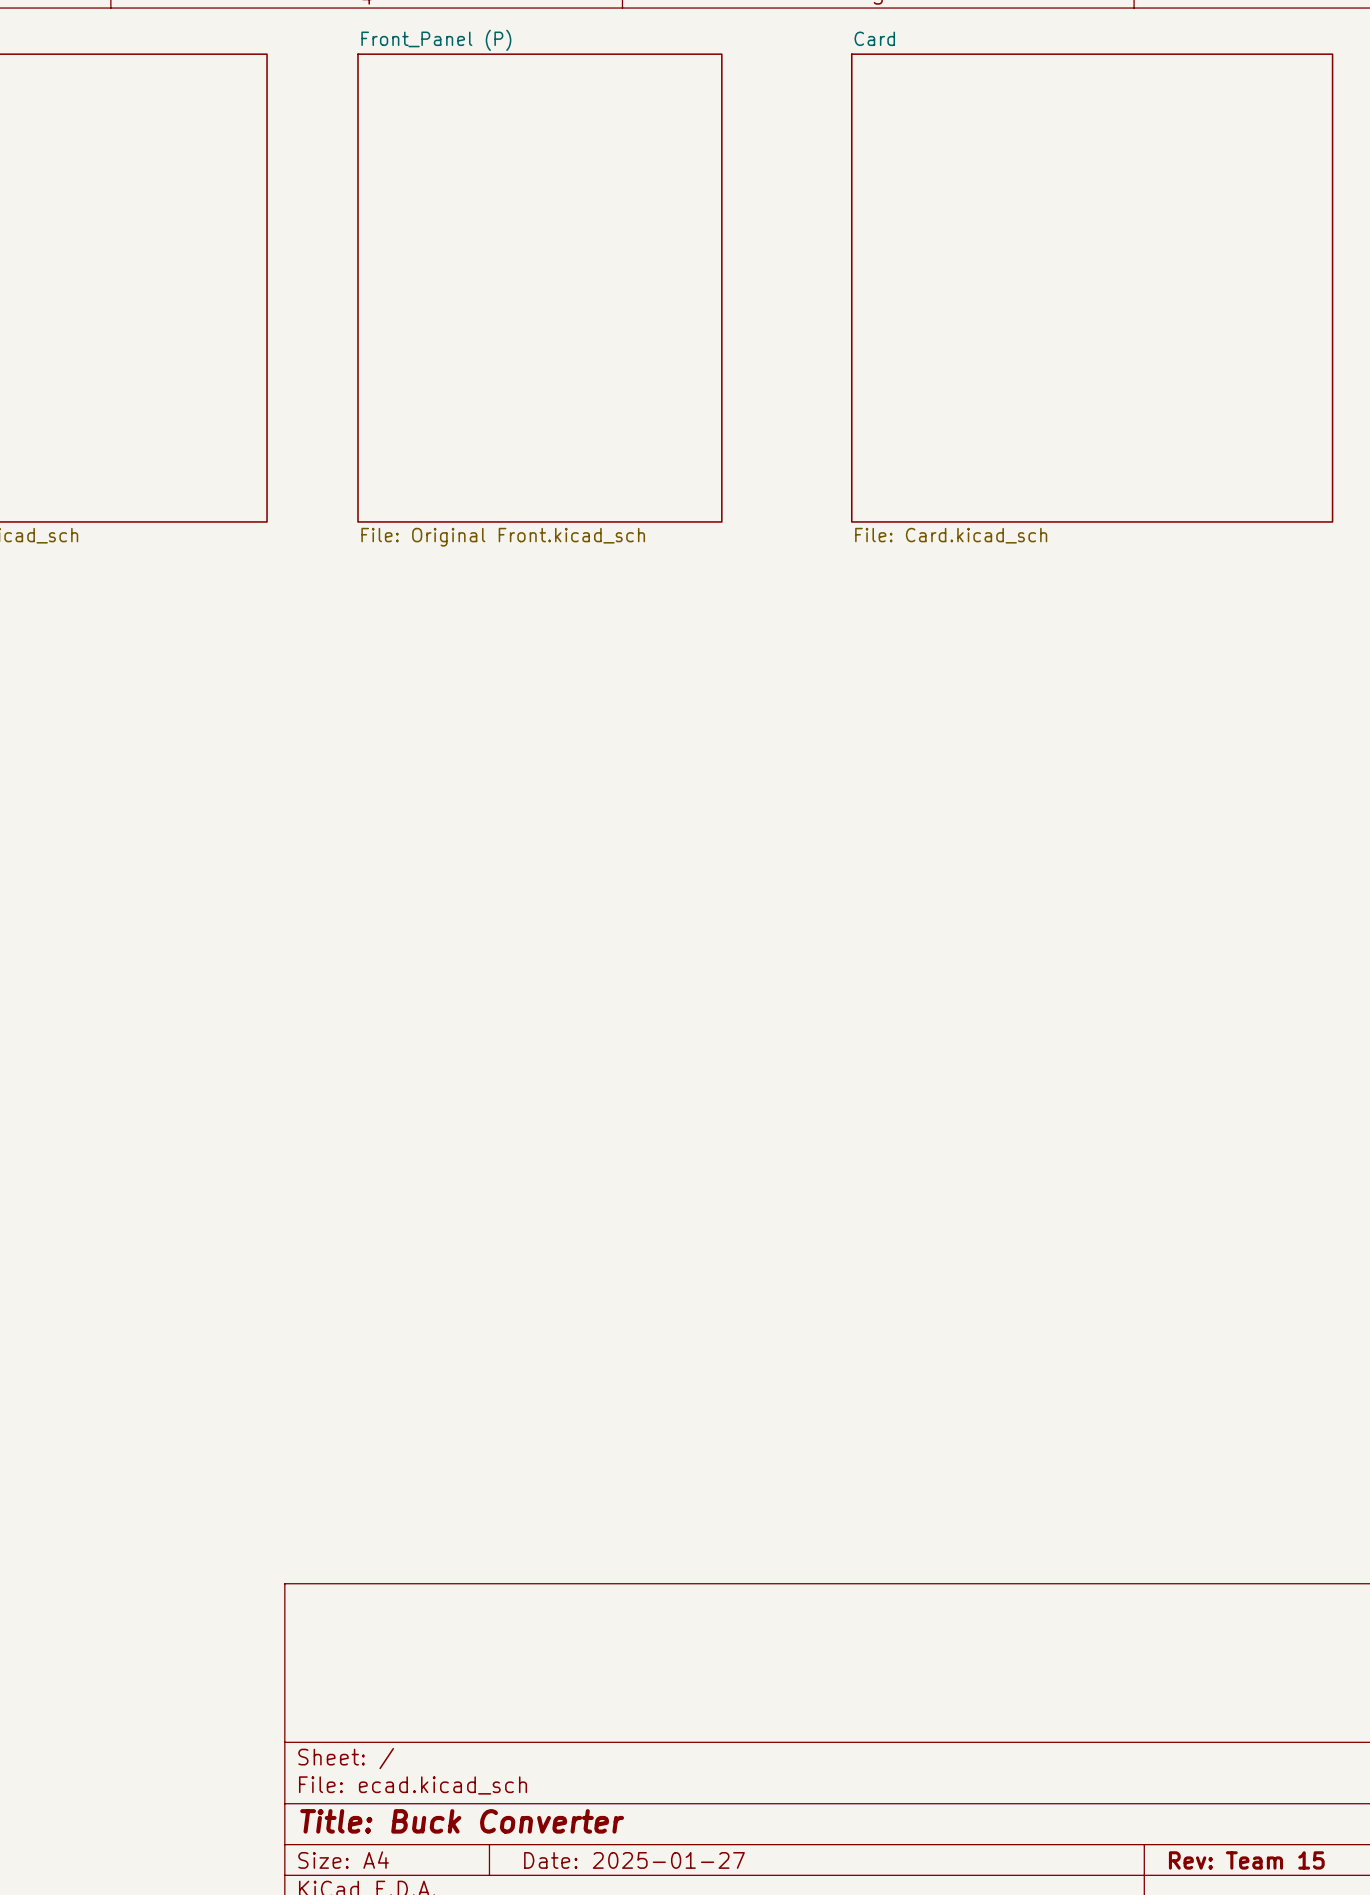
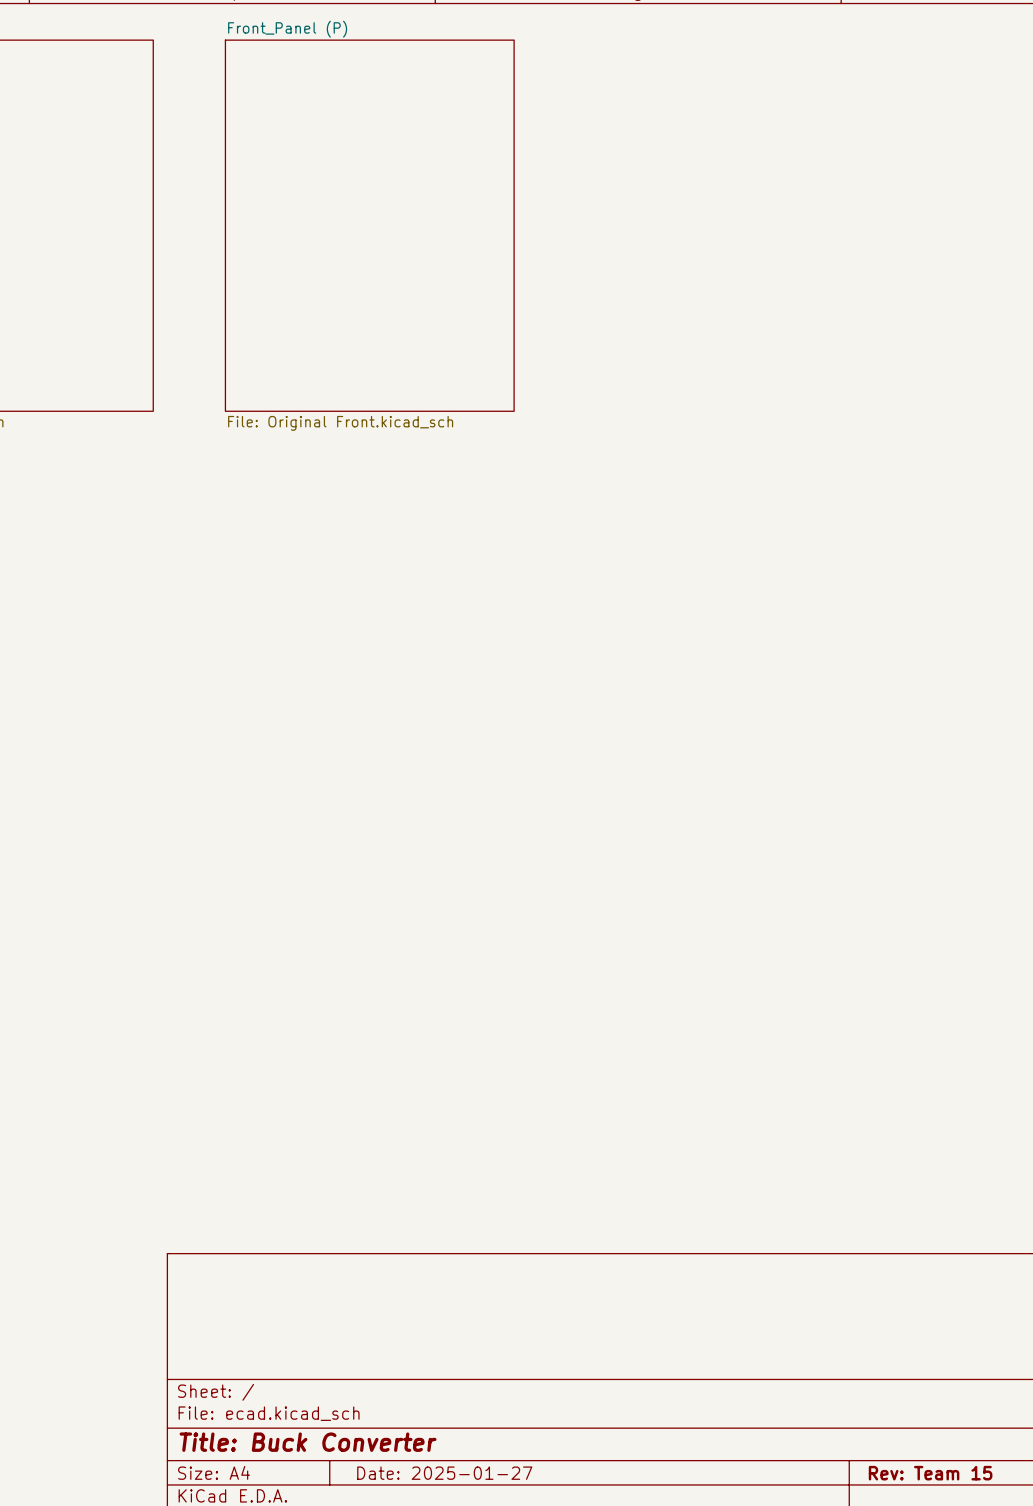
sheet Card: File: Card.kicad_sch (1092, 288) -> none

